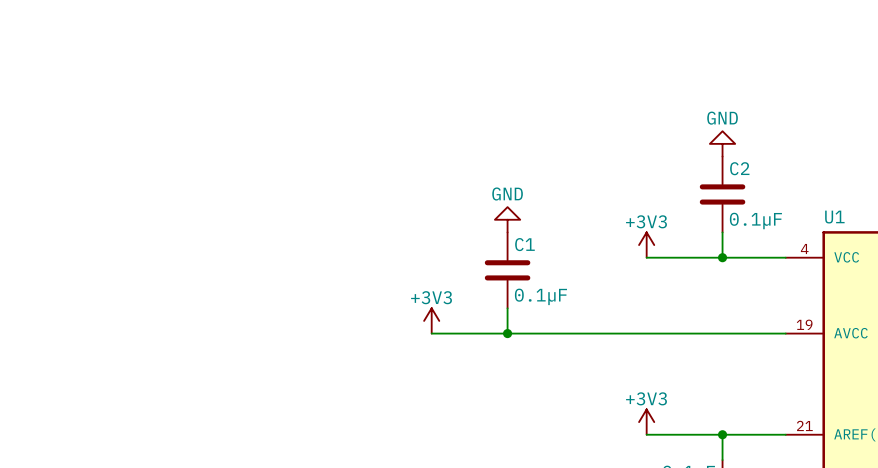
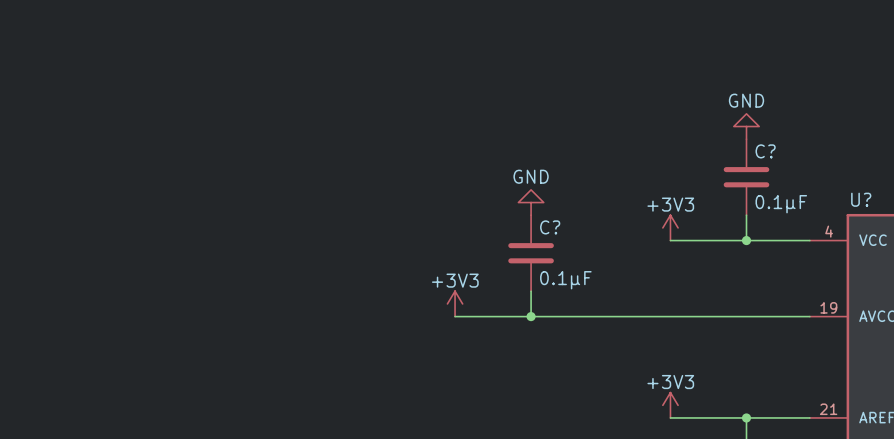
C2 name: C2 (739, 168) -> C? (765, 151)
U1 name: U1 (834, 217) -> U? (861, 199)
C1 name: C1 (524, 244) -> C? (550, 227)

